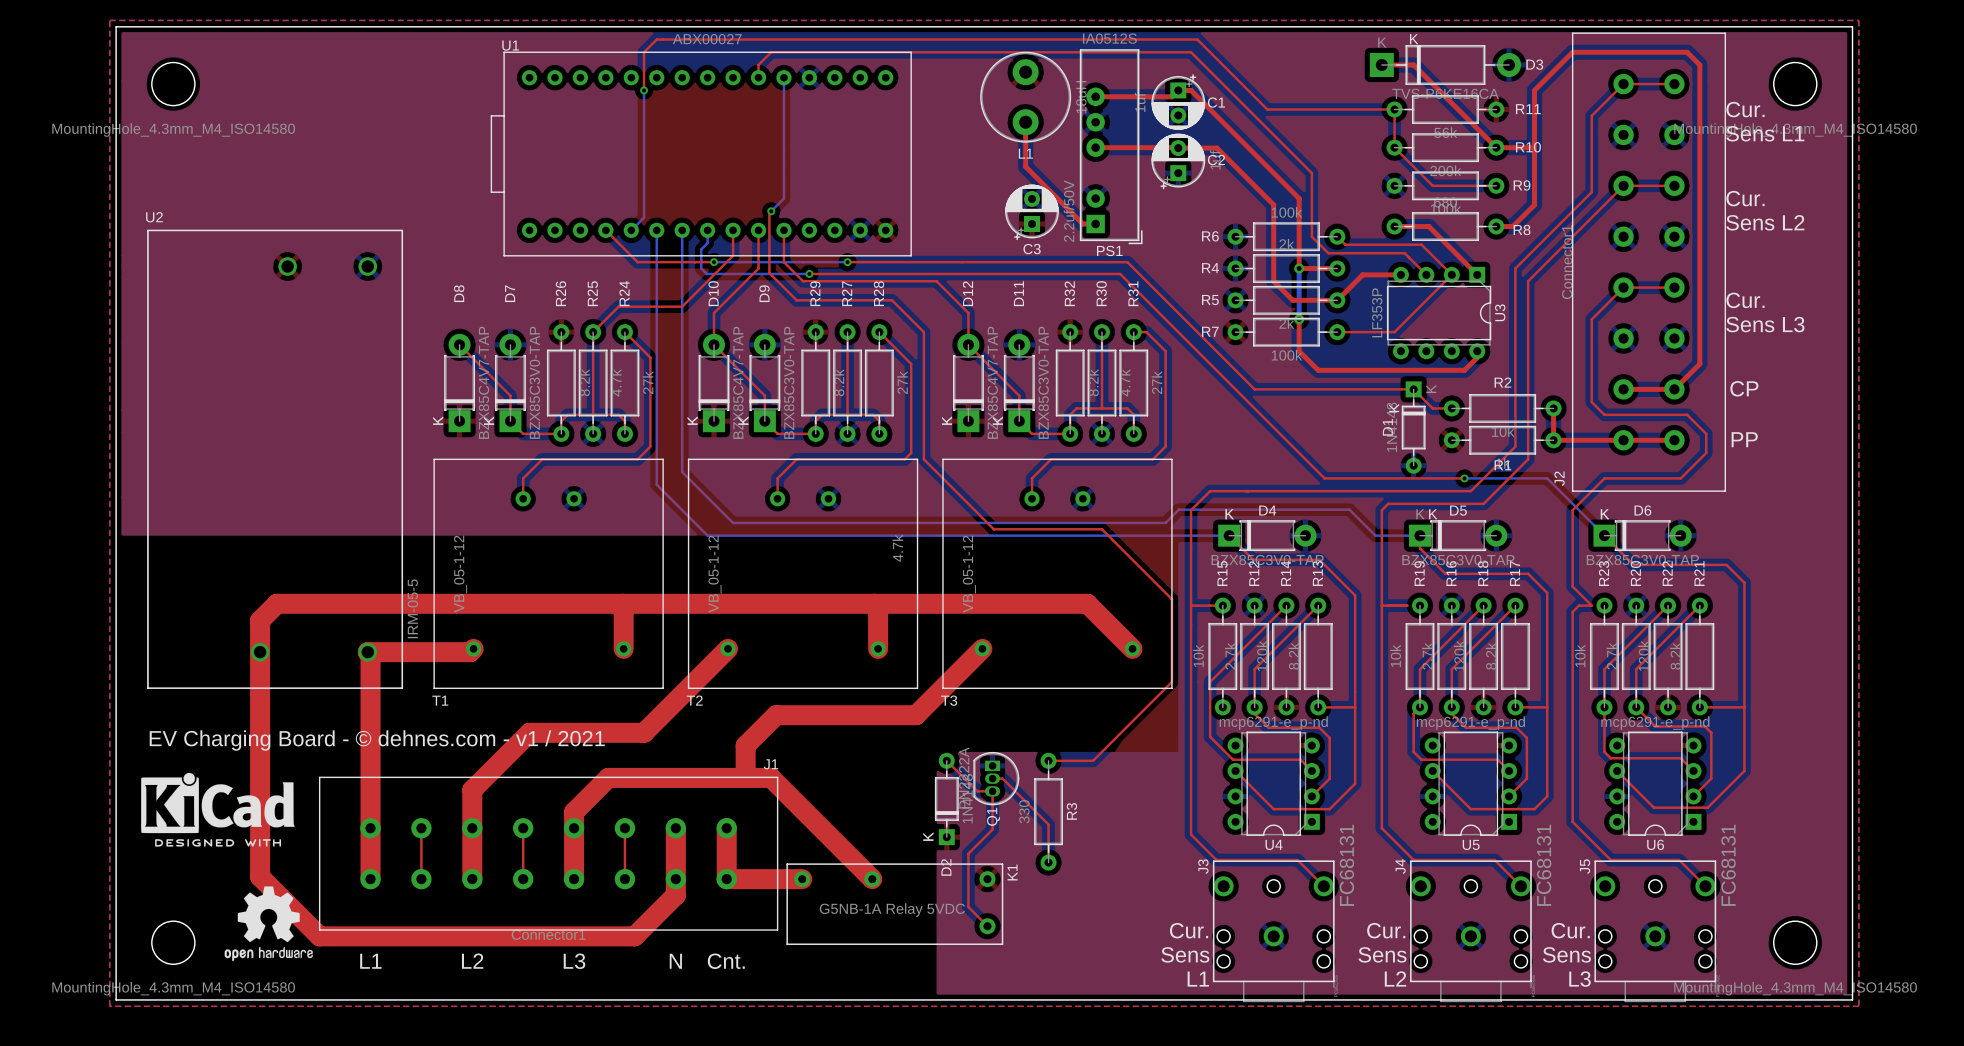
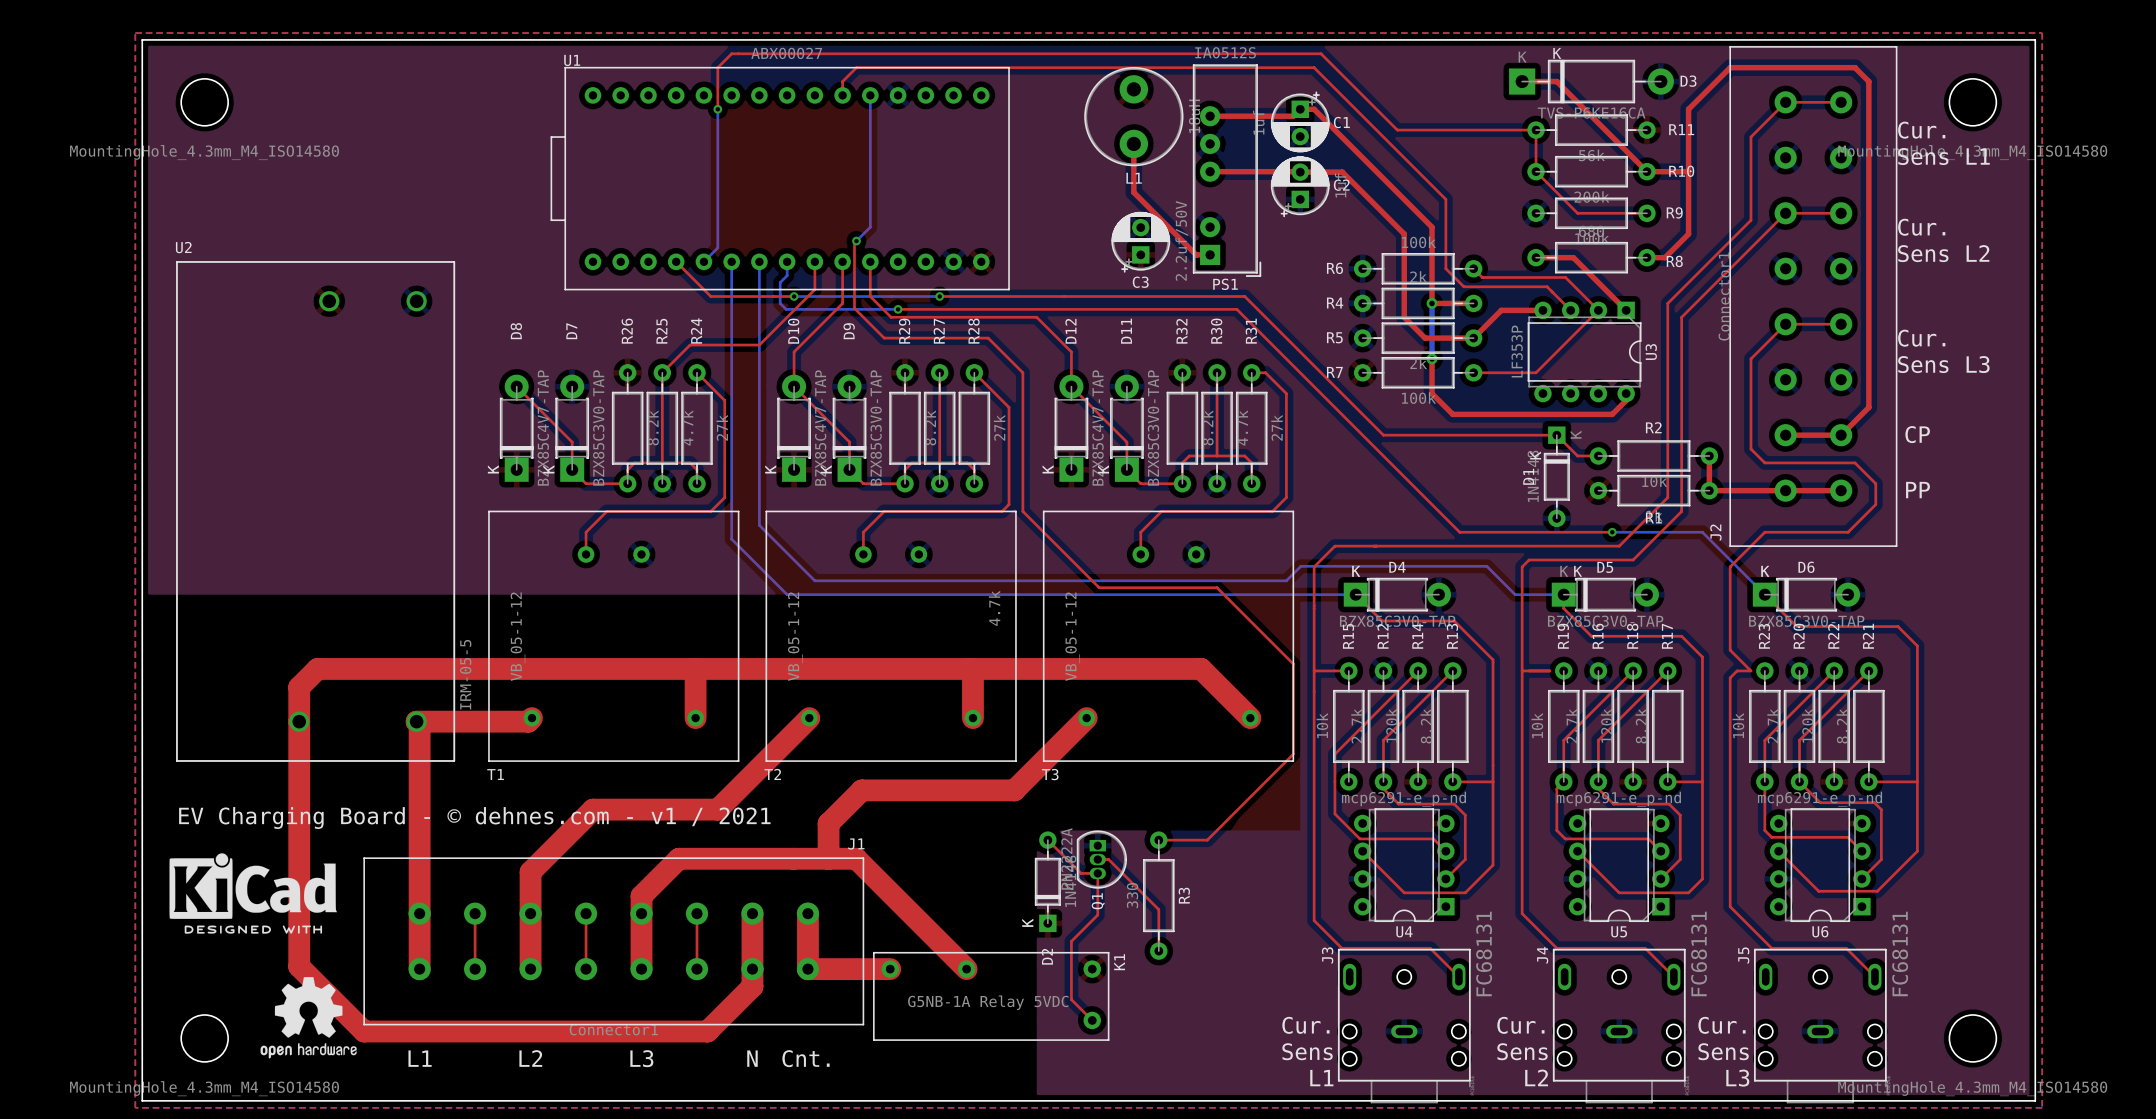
J3 footprint: [1212, 860, 1335, 1003] -> [1338, 948, 1471, 1104]
J4 footprint: [1410, 860, 1532, 1003] -> [1553, 948, 1686, 1104]
J5 footprint: [1594, 860, 1717, 1003] -> [1754, 948, 1887, 1104]

